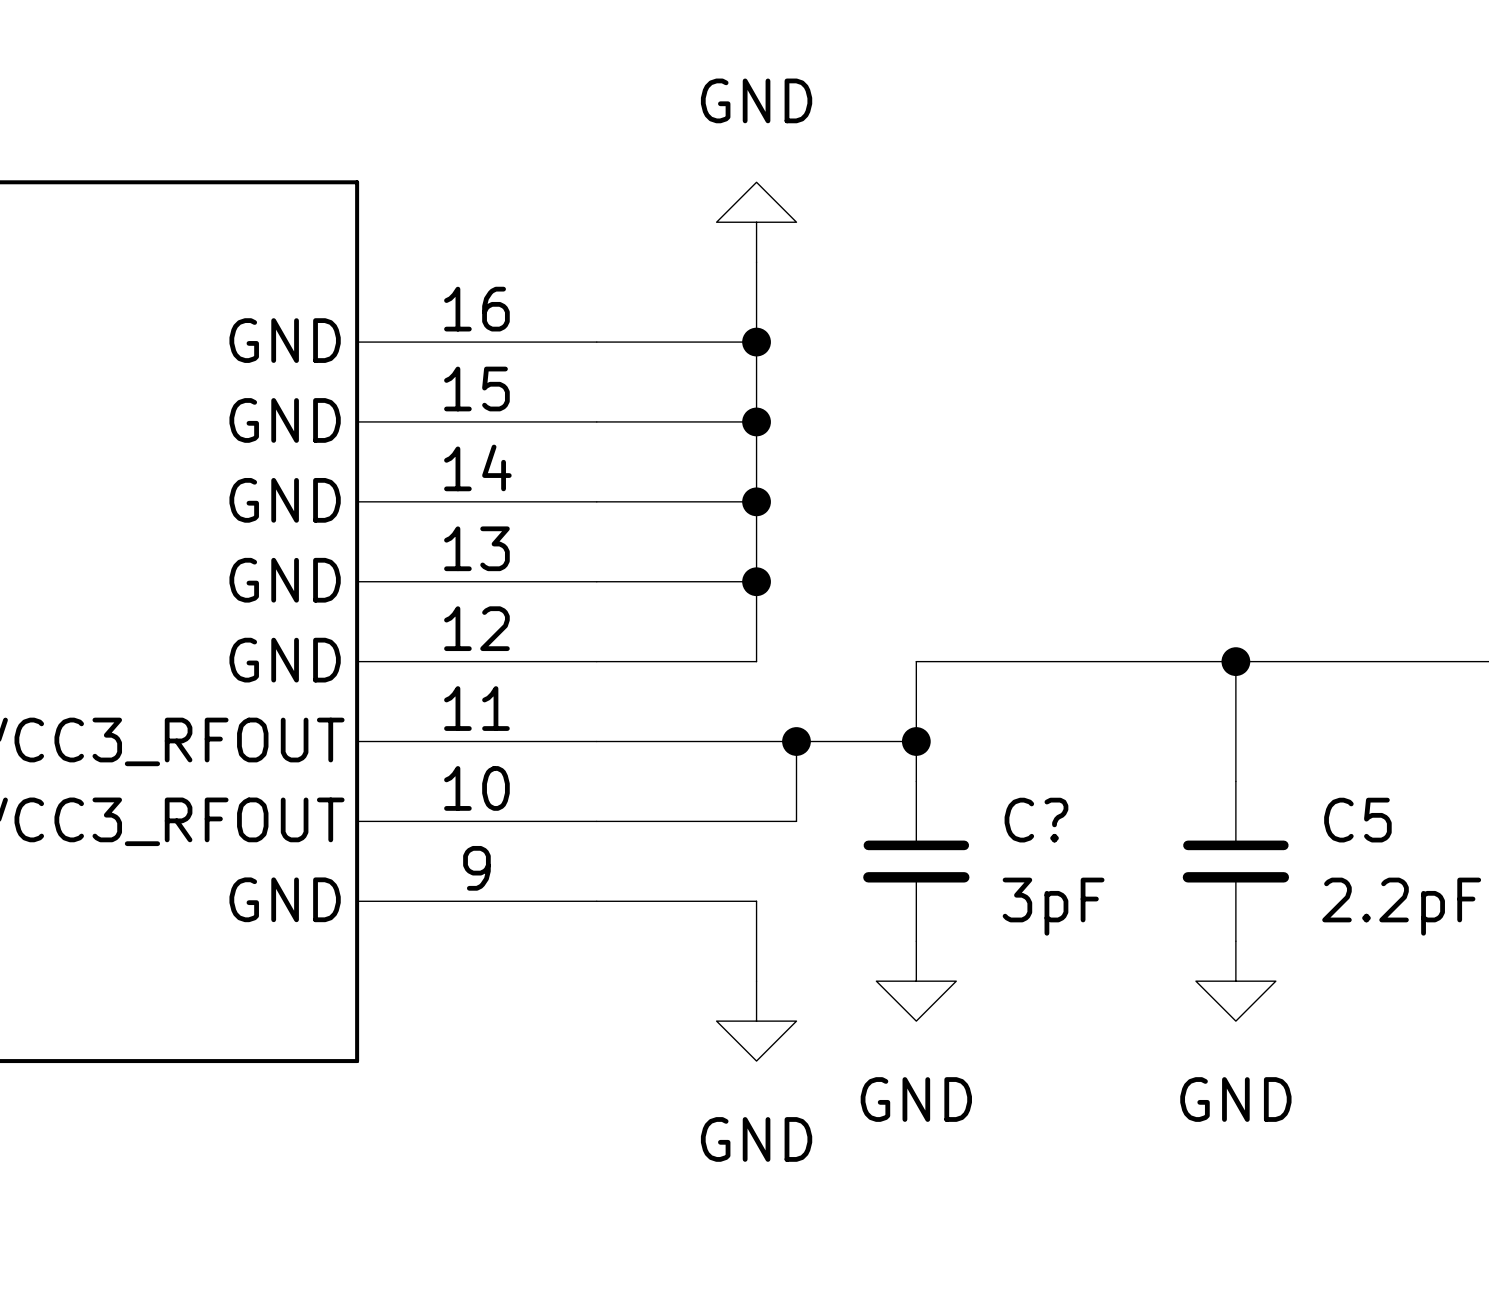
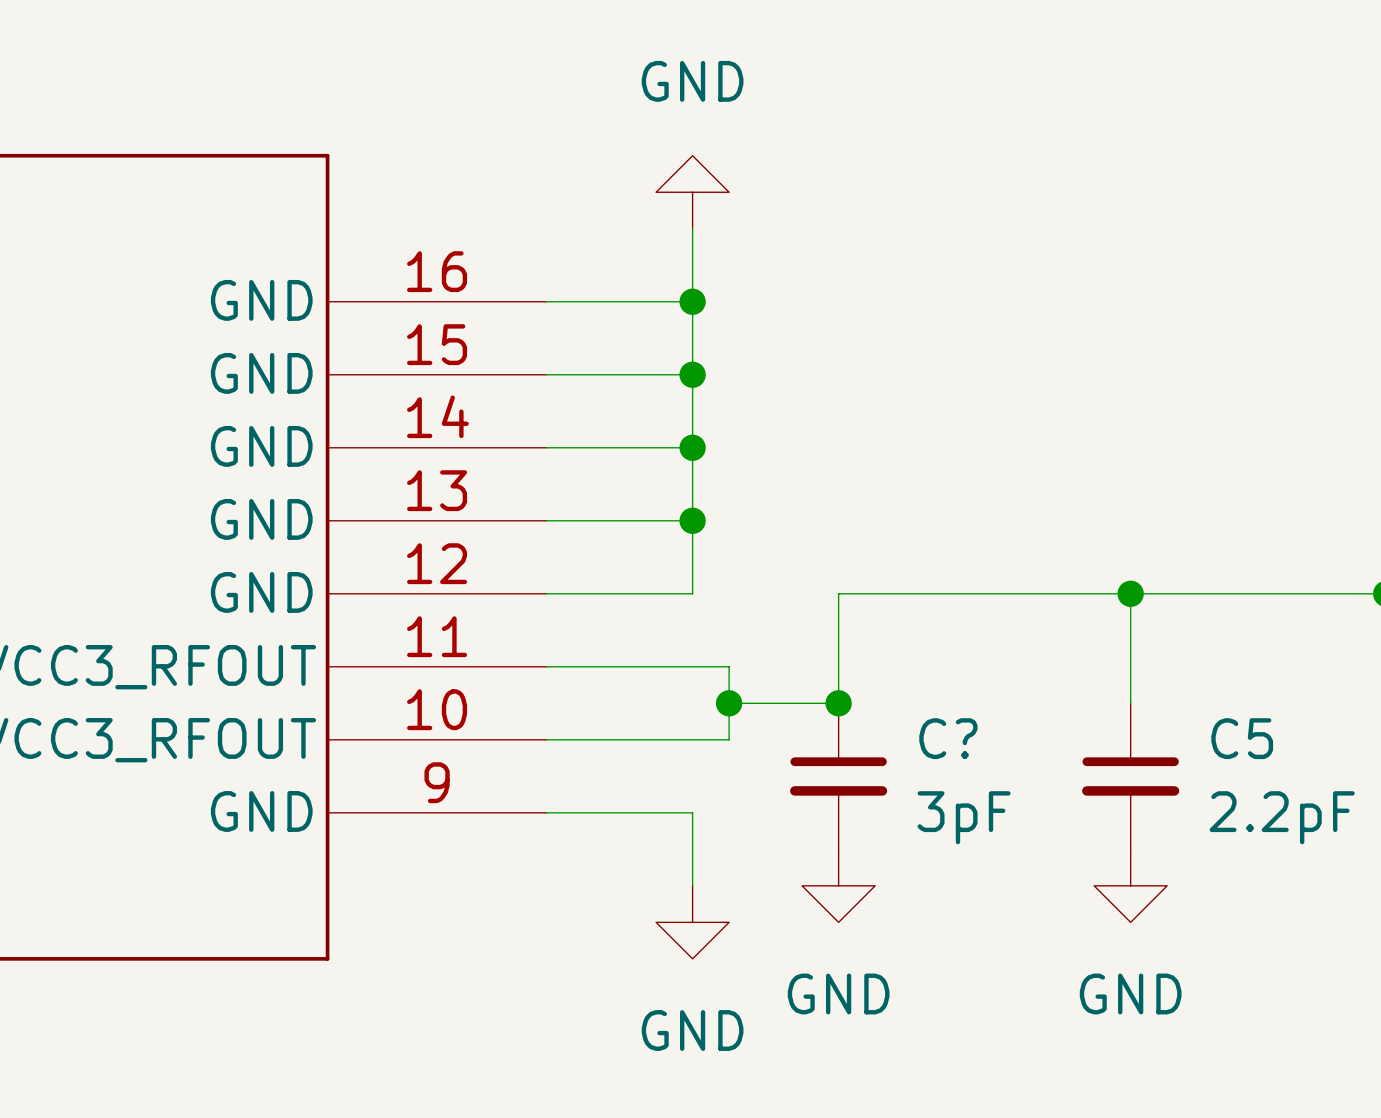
wire: (796, 741) (916, 741) -> (729, 703) (838, 703)
junction position: (796, 741) -> (729, 703)
junction position: (916, 741) -> (838, 703)

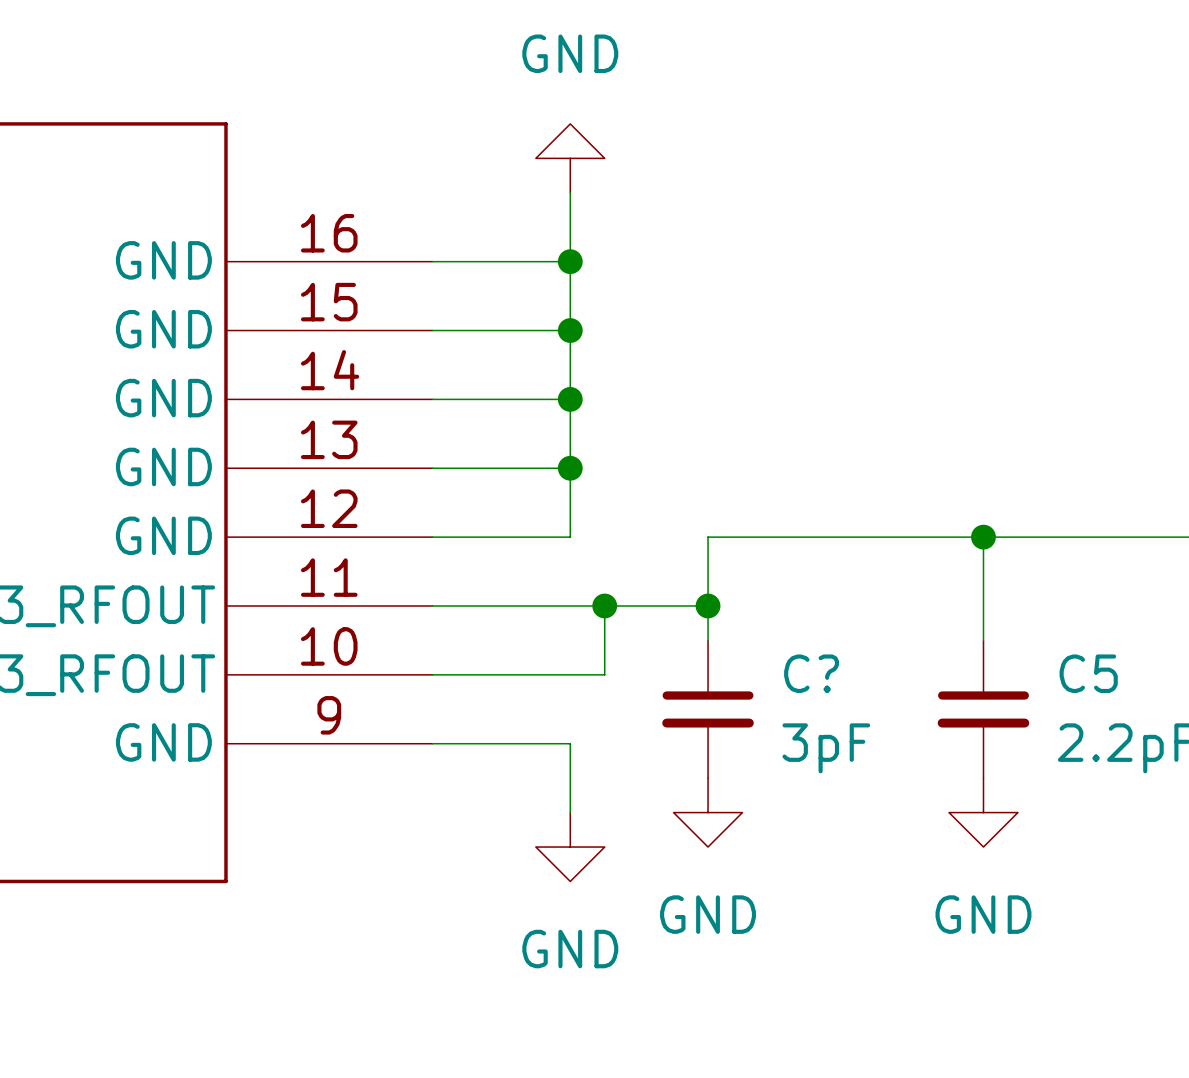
wire: (729, 703) (838, 703) -> (604, 605) (708, 605)
junction position: (729, 703) -> (604, 605)
junction position: (838, 703) -> (708, 605)

